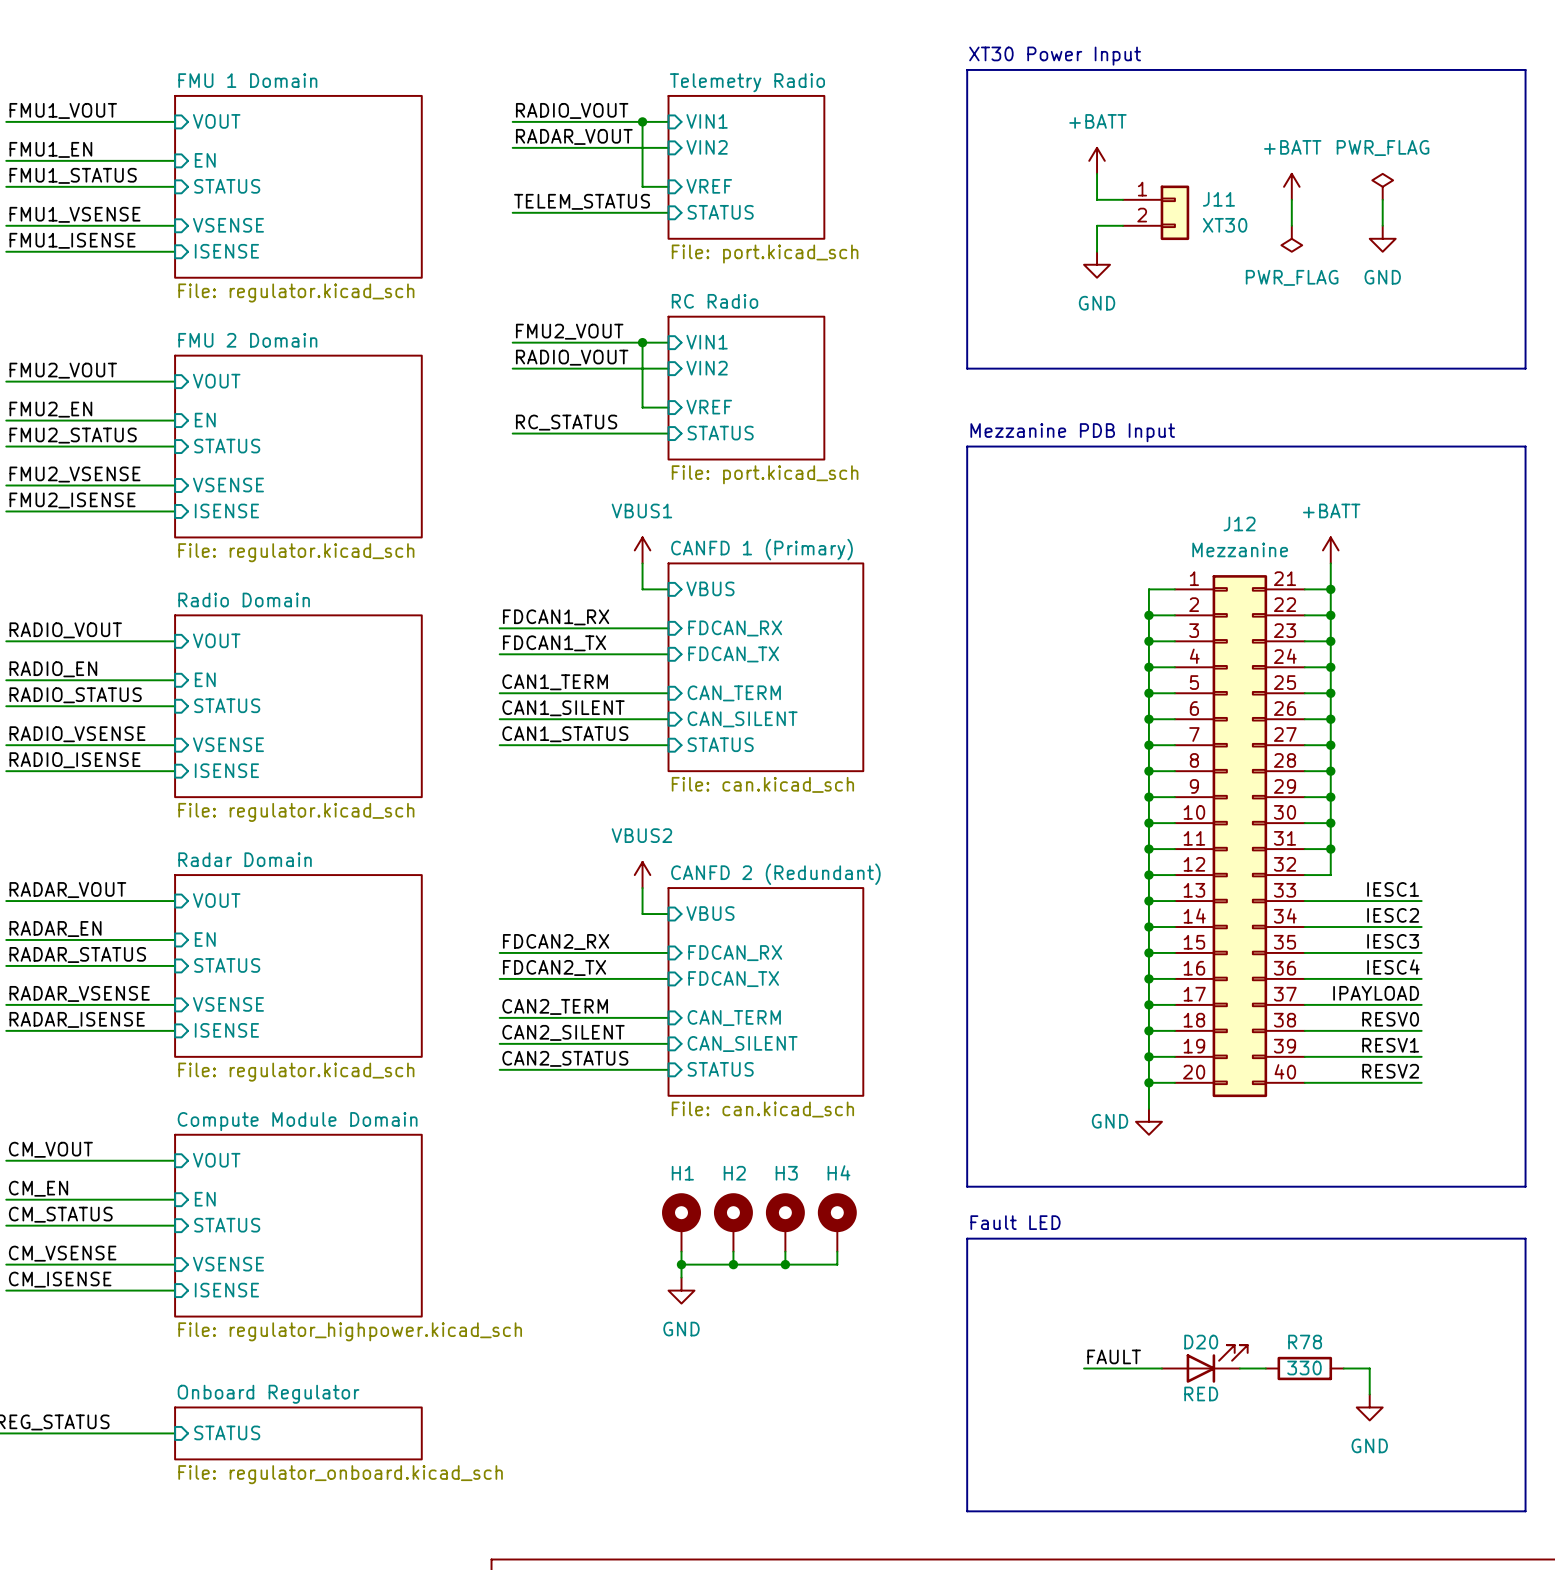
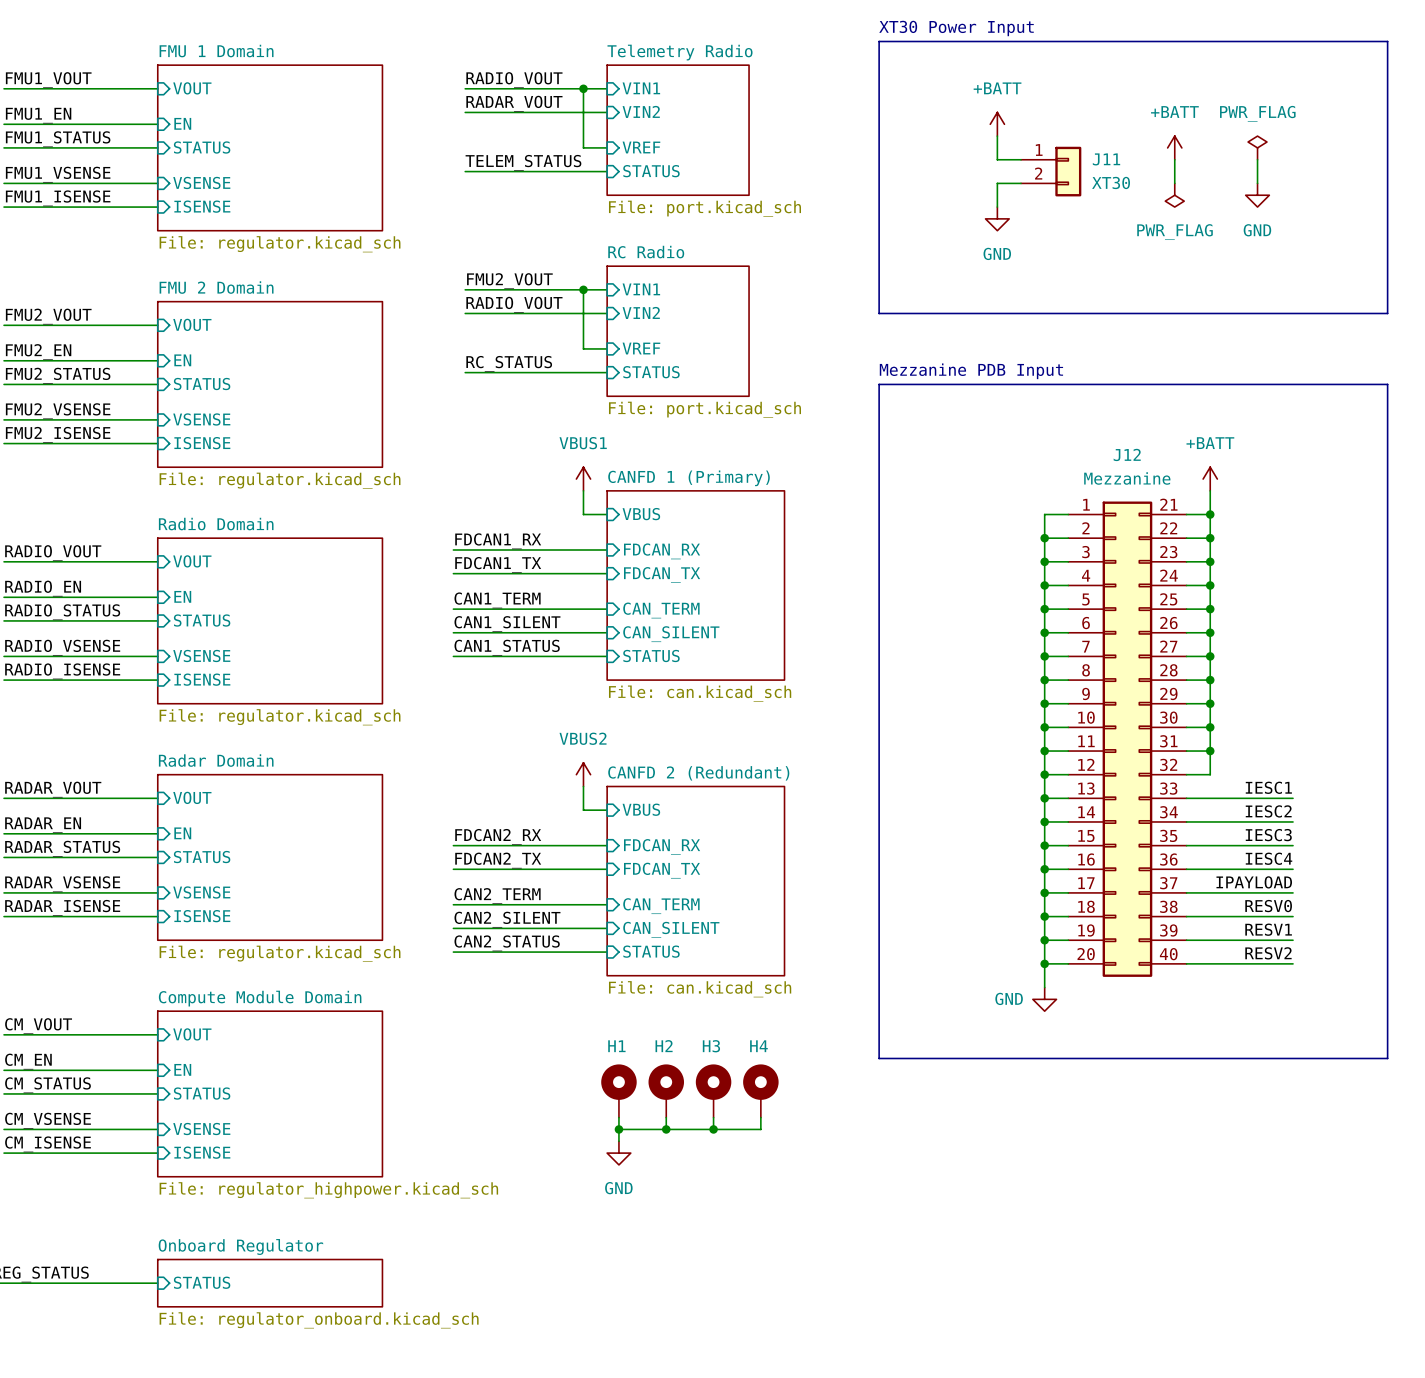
text: Fault LED (1015, 1222) -> none
line: (967, 1238) (1525, 1238) (1525, 1511) (967, 1511) (967, 1238) -> none
label: FAULT (1114, 1356) -> none
D20: RED (1204, 1363) -> none
wire: (1084, 1368) (1161, 1368) -> none
wire: (1239, 1368) (1265, 1368) -> none
R78: 330 (1304, 1368) -> none
wire: (1343, 1368) (1369, 1368) (1369, 1394) -> none
power symbol: GND (1369, 1407) -> none

